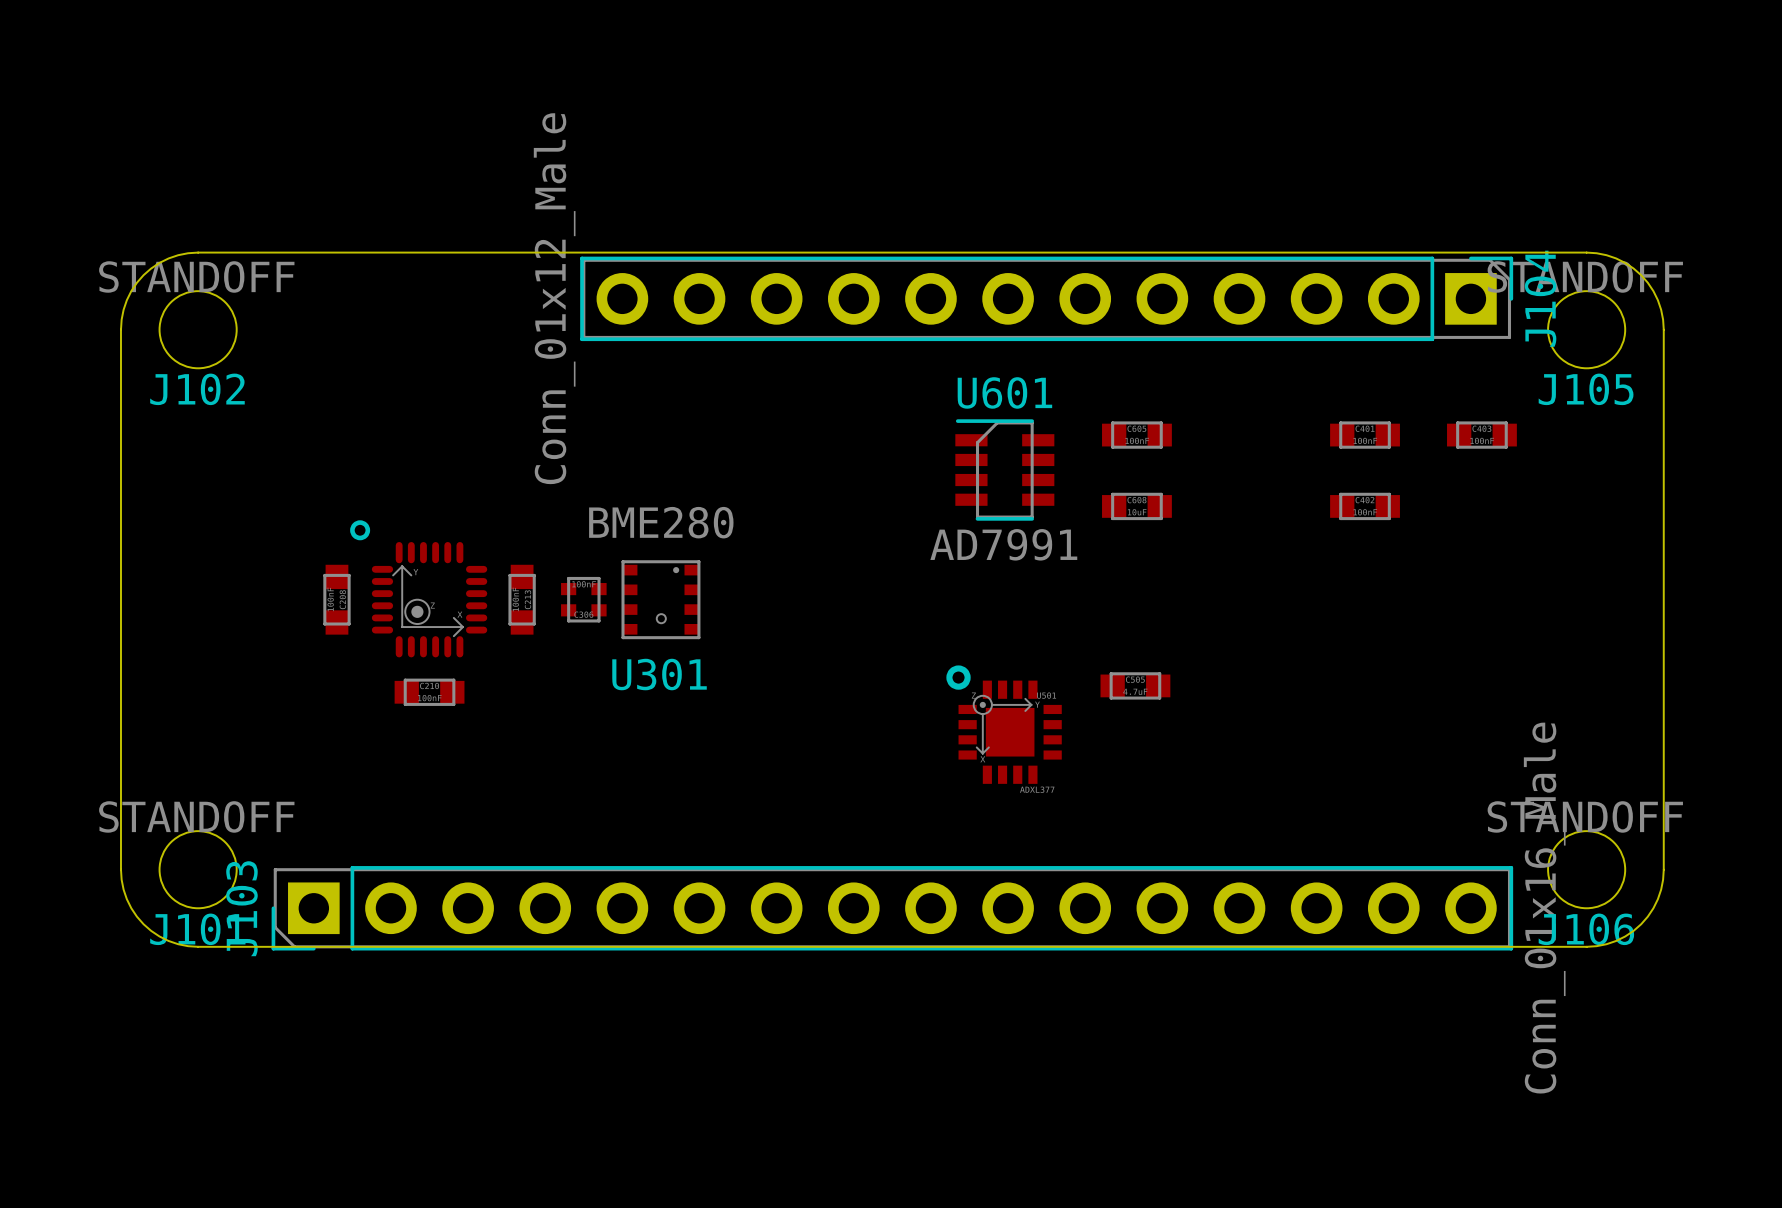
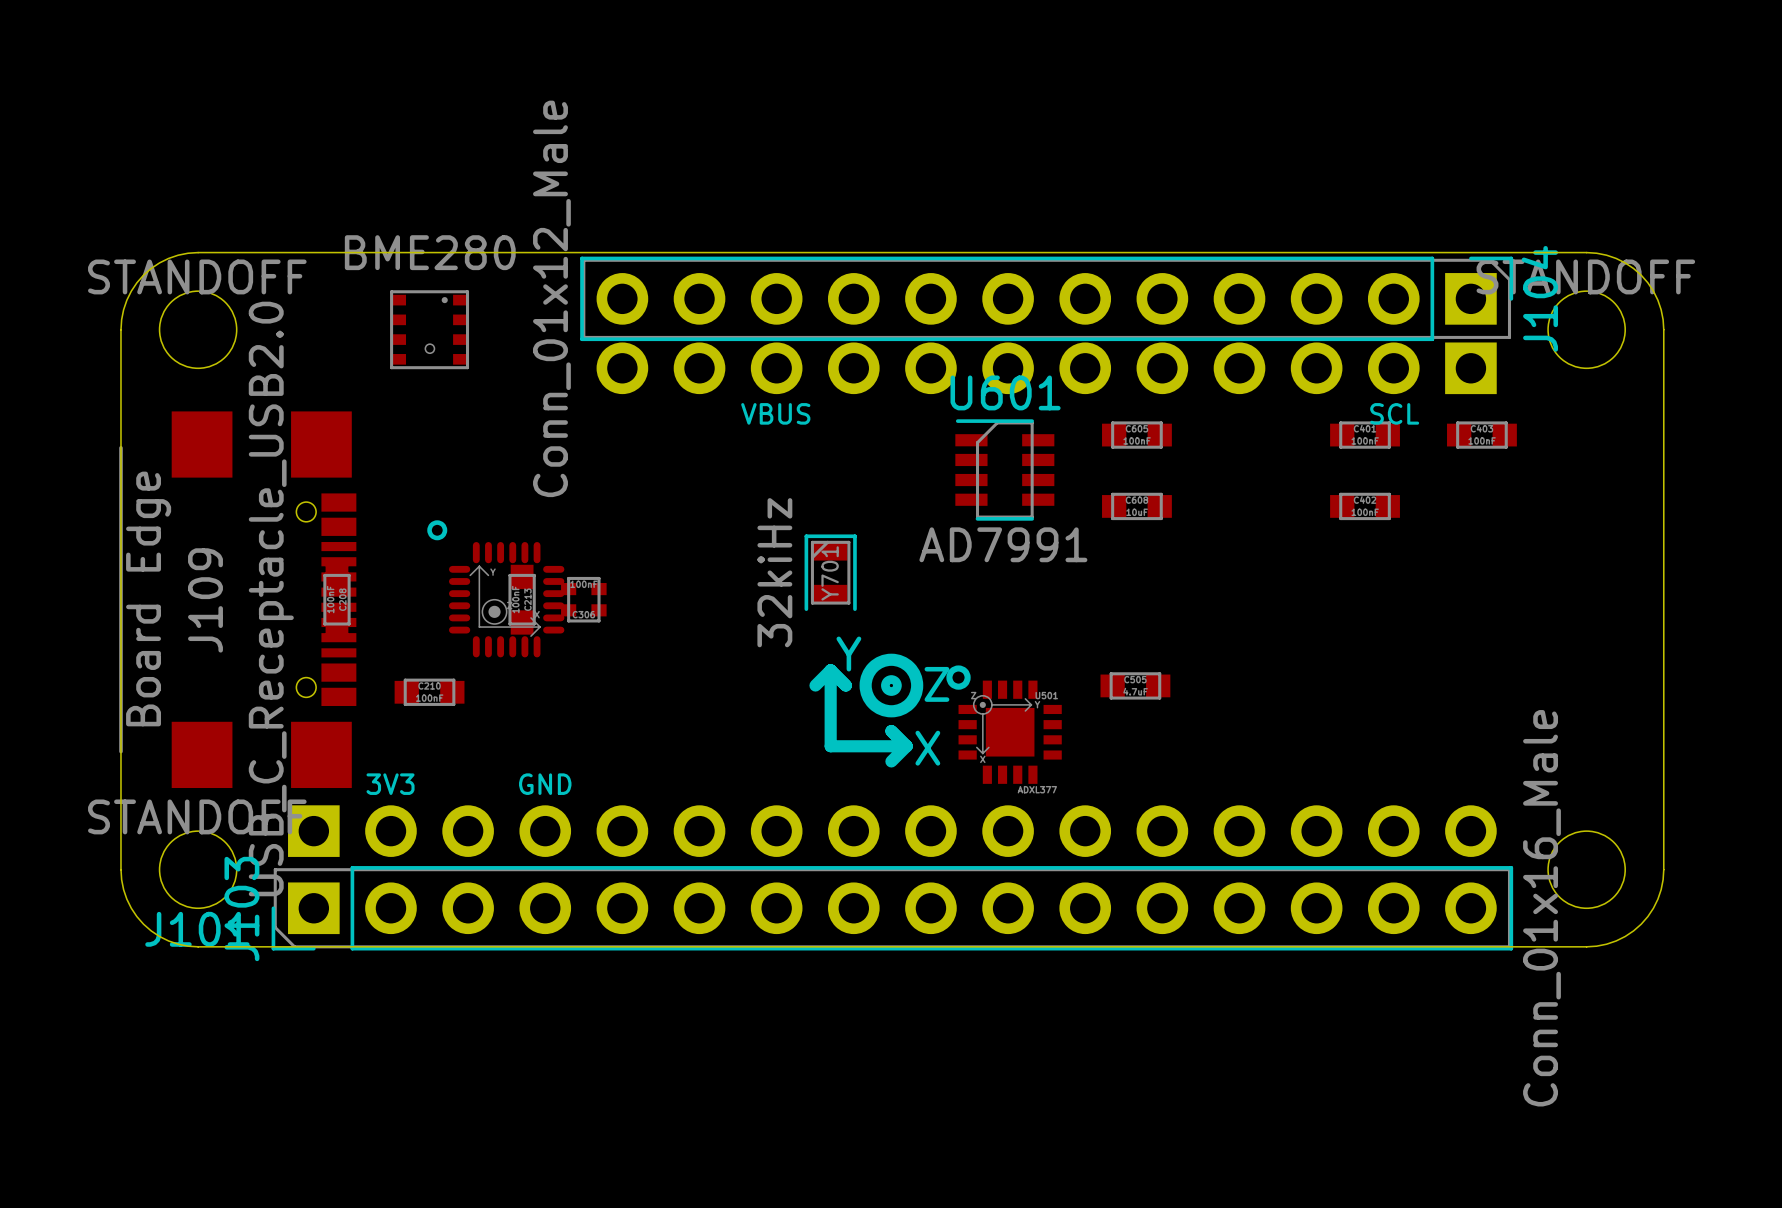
part: none -> BME280 (429, 329)
part: none -> (1046, 368)
J102 name: J102 (197, 389) -> none
J105 name: J105 (1586, 389) -> none
text: none -> VBUS (775, 413)
text: none -> SCL (1394, 413)
Y701: none -> 32kiHz (830, 572)
part position: (418, 588) -> (495, 588)
J109: none -> USB_C_Receptacle_USB2.0 (237, 599)
U301: BME280 (660, 599) -> none
drawing: none -> [809, 653, 924, 768]
text: none -> 3V3 (390, 784)
text: none -> GND (545, 784)
J106 value: STANDOFF (1585, 816) -> none
part: none -> (892, 831)
J106 name: J106 (1586, 929) -> none

